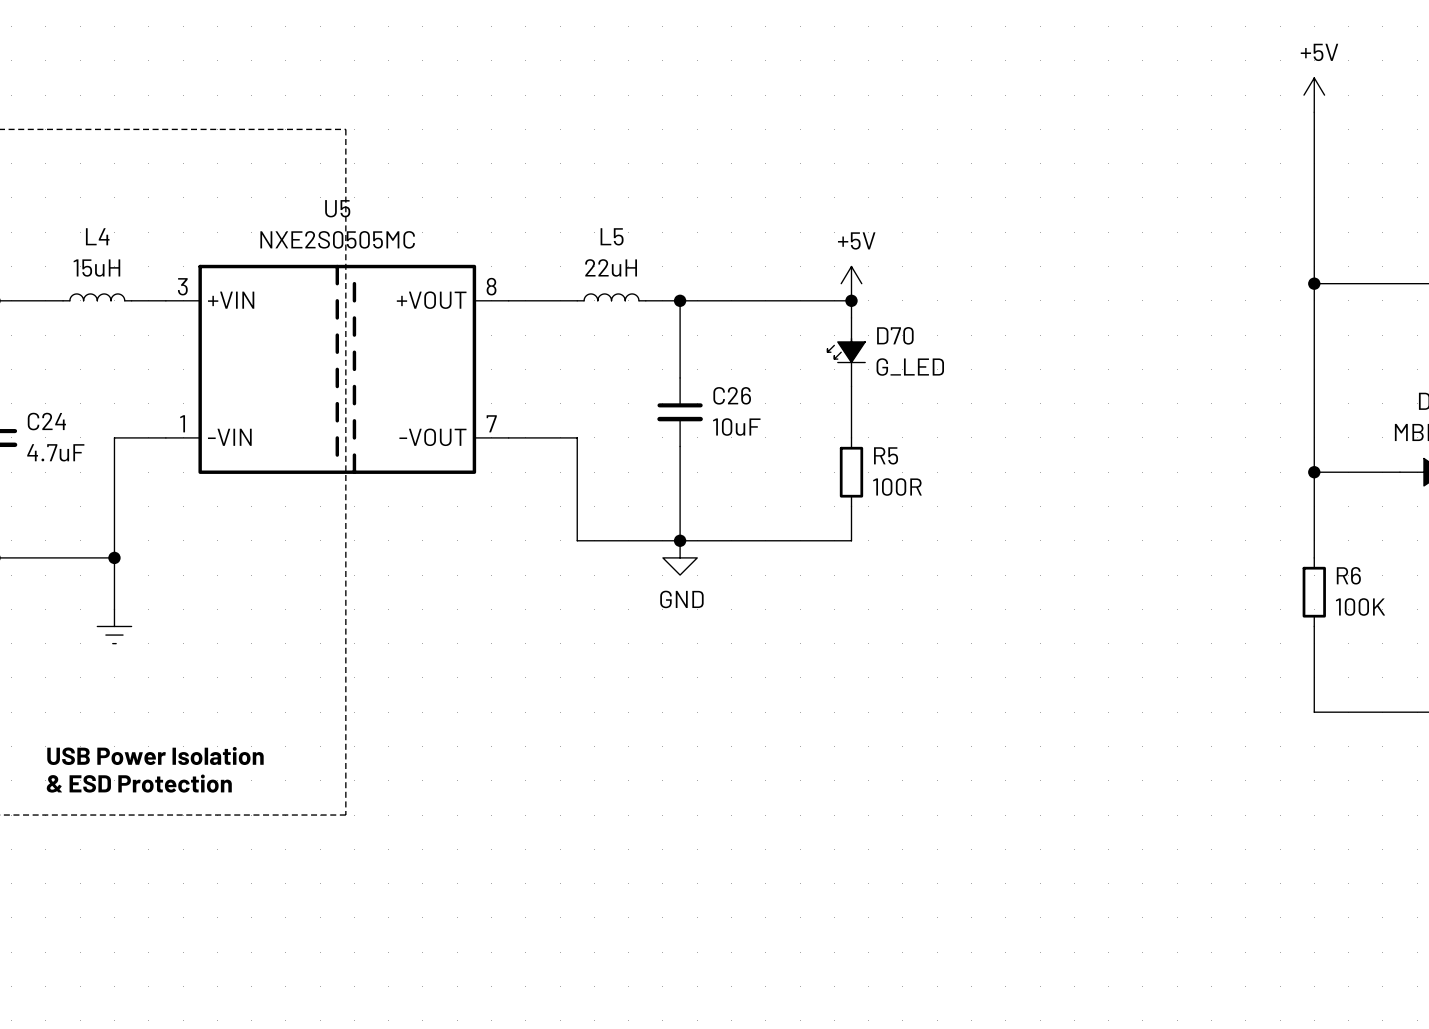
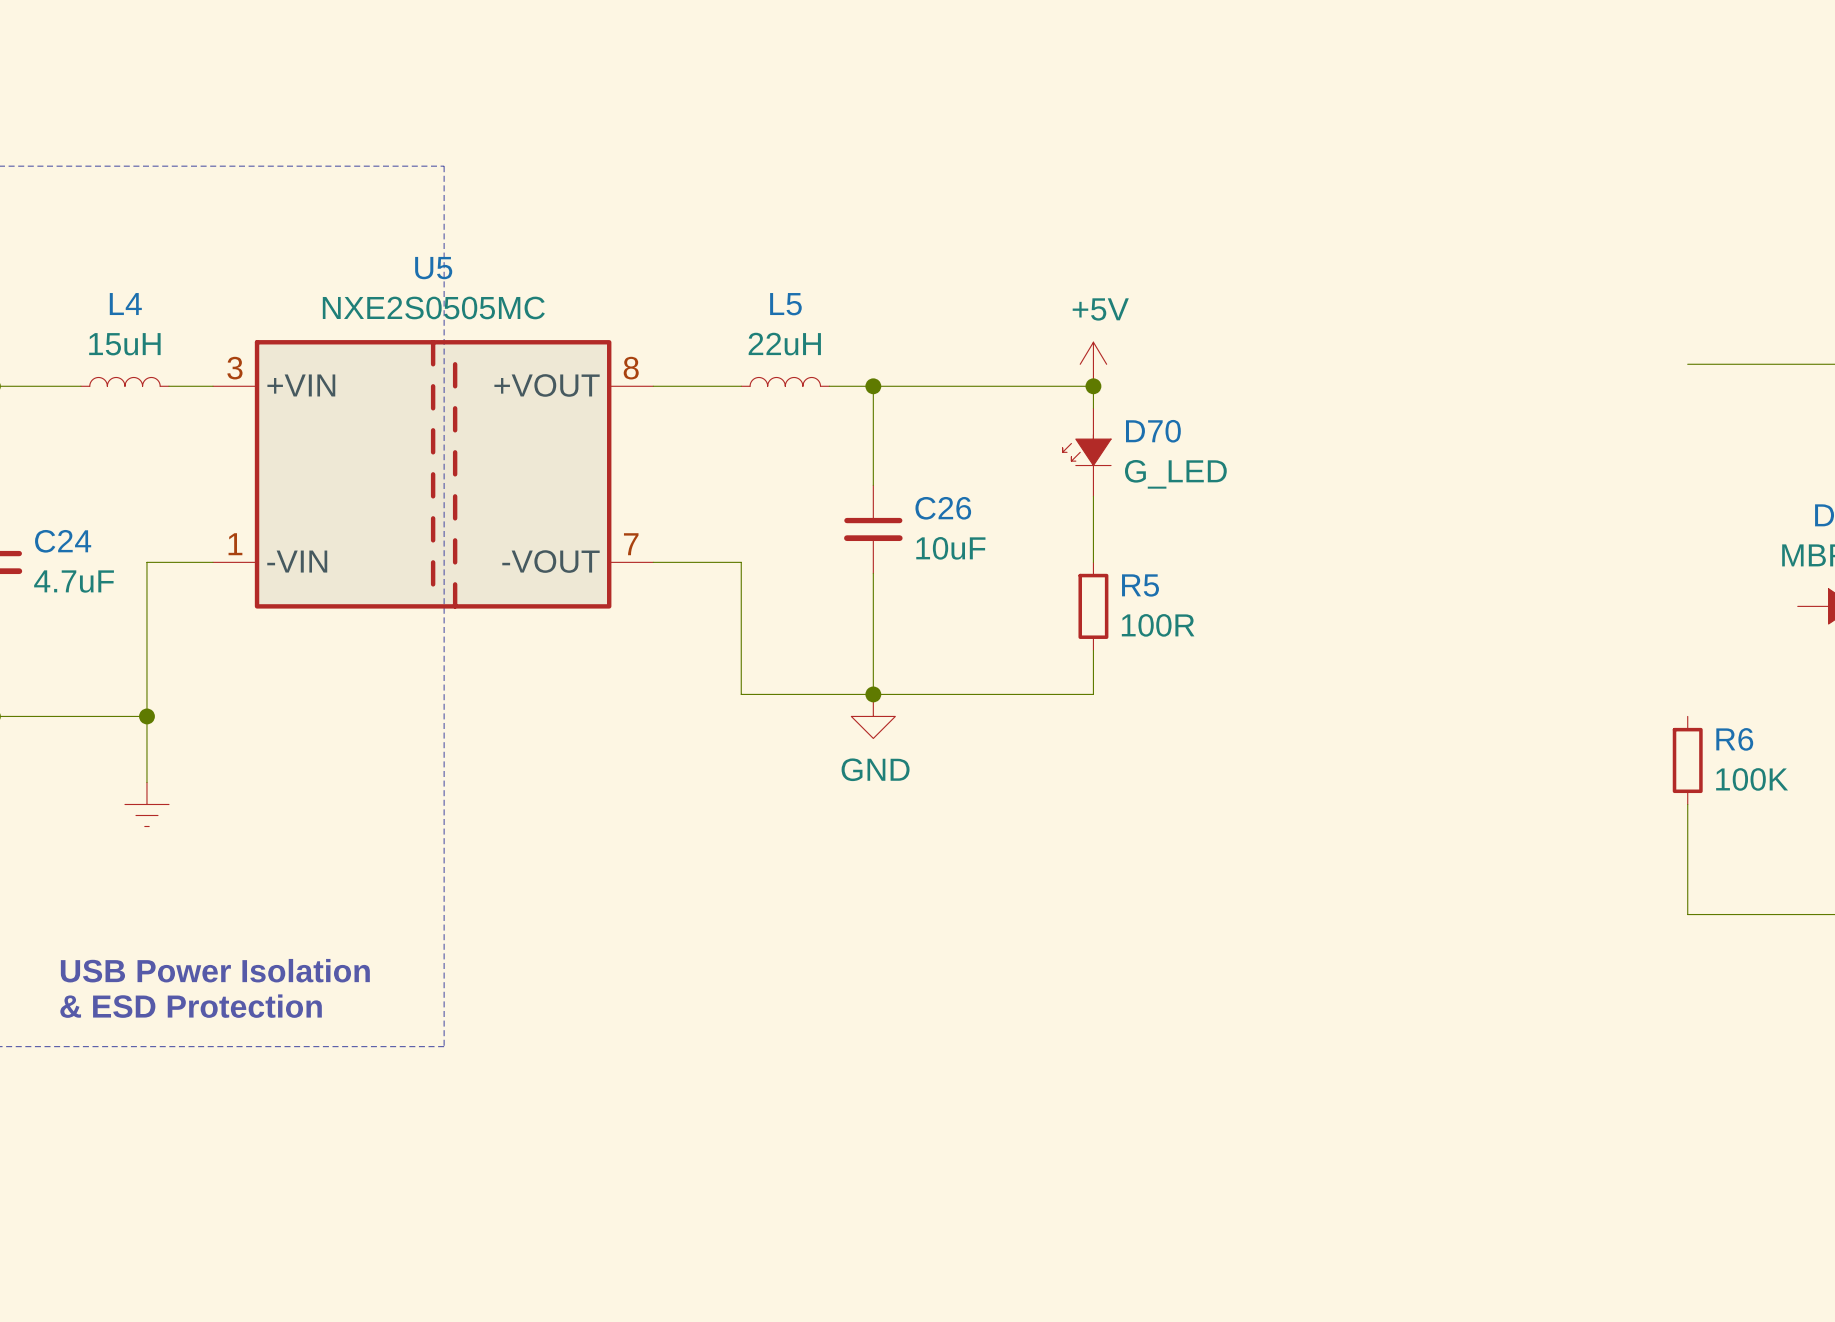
power symbol: +5V (1314, 95) -> none
wire: (1314, 112) (1314, 557) -> none
junction: (1314, 283) -> none
wire: (1314, 472) (1399, 472) -> none
junction: (1314, 472) -> none

